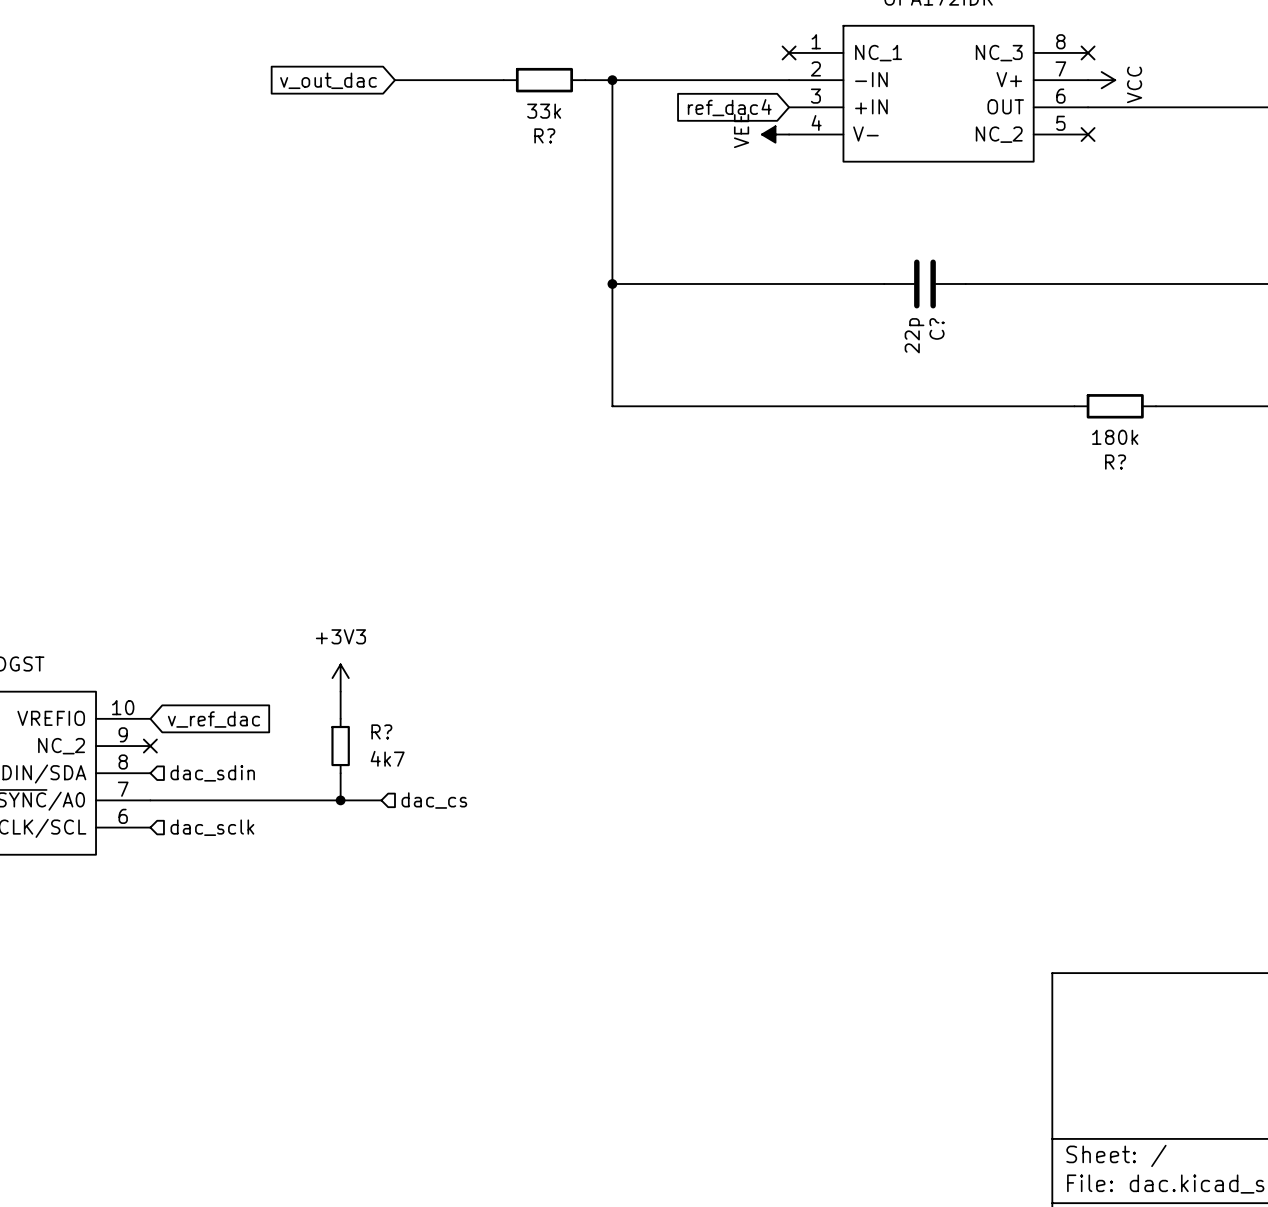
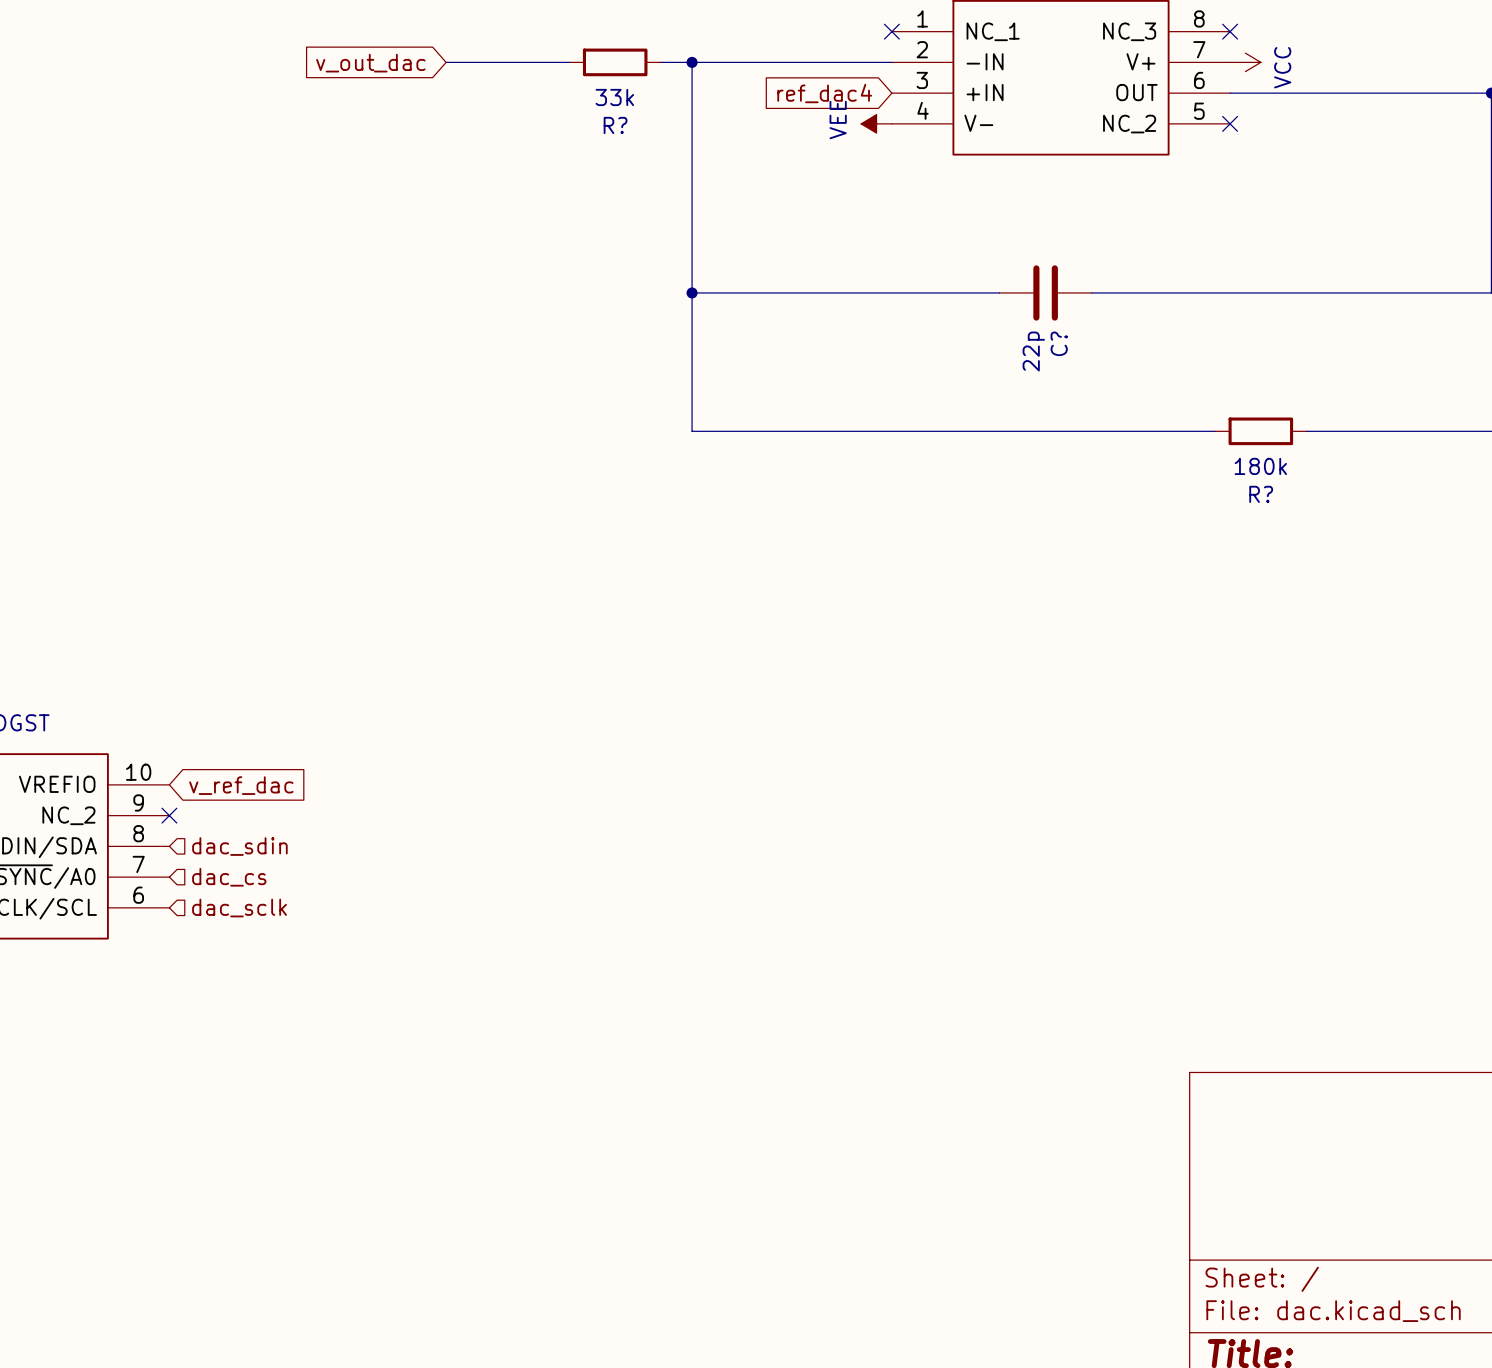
power symbol: +3V3 (340, 678) -> none
wire: (340, 691) (340, 718) -> none
R?: 4k7 (340, 746) -> none
wire: (340, 773) (340, 800) -> none
wire: (150, 800) (381, 800) -> none
junction: (340, 800) -> none
hierarchical label position: dac_cs (434, 800) -> dac_cs (229, 877)

